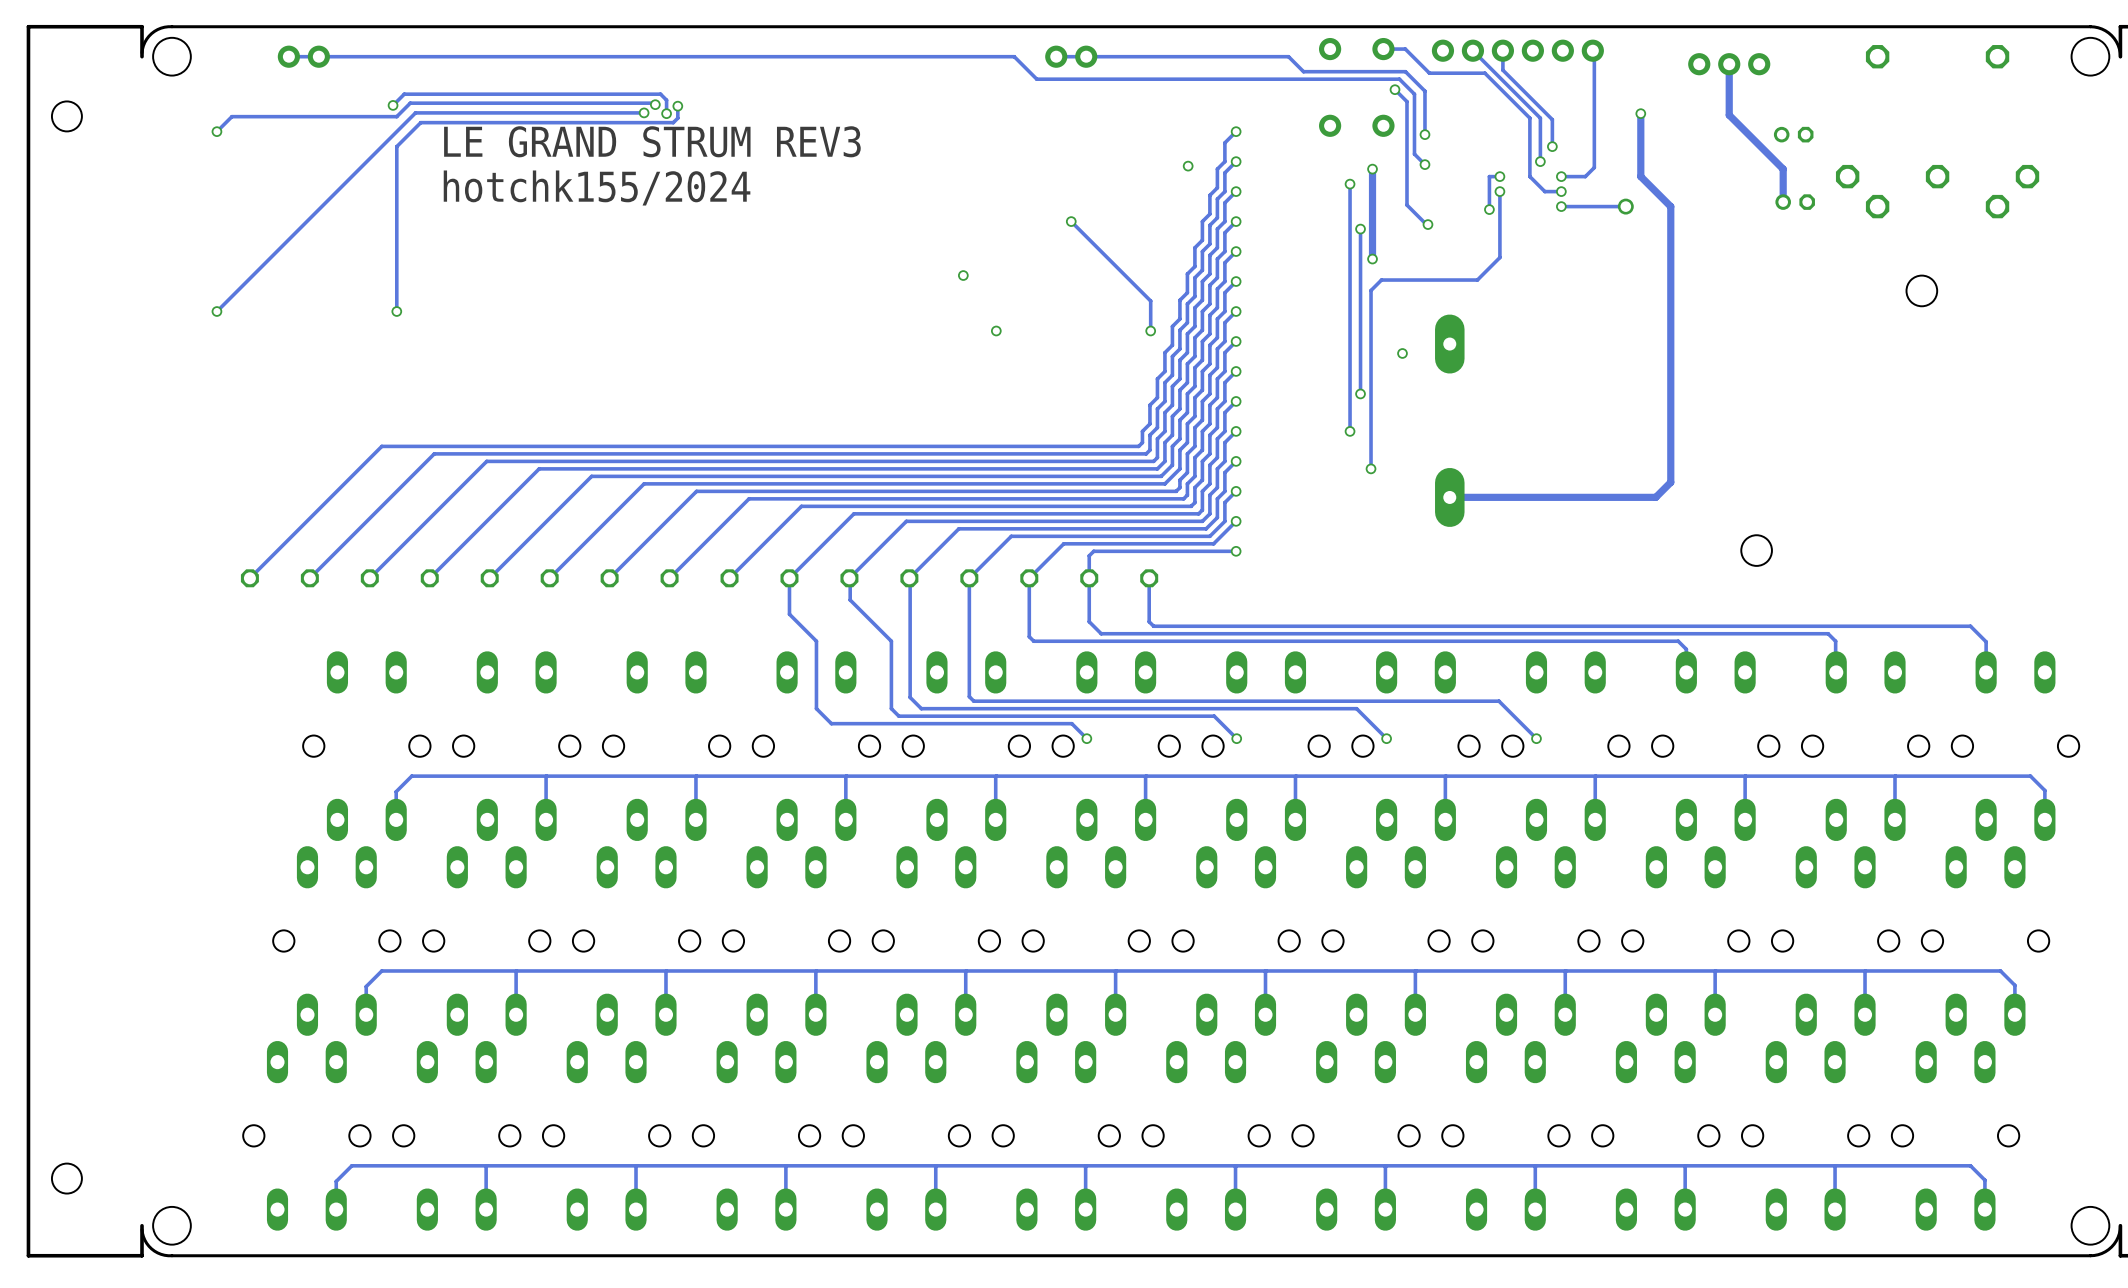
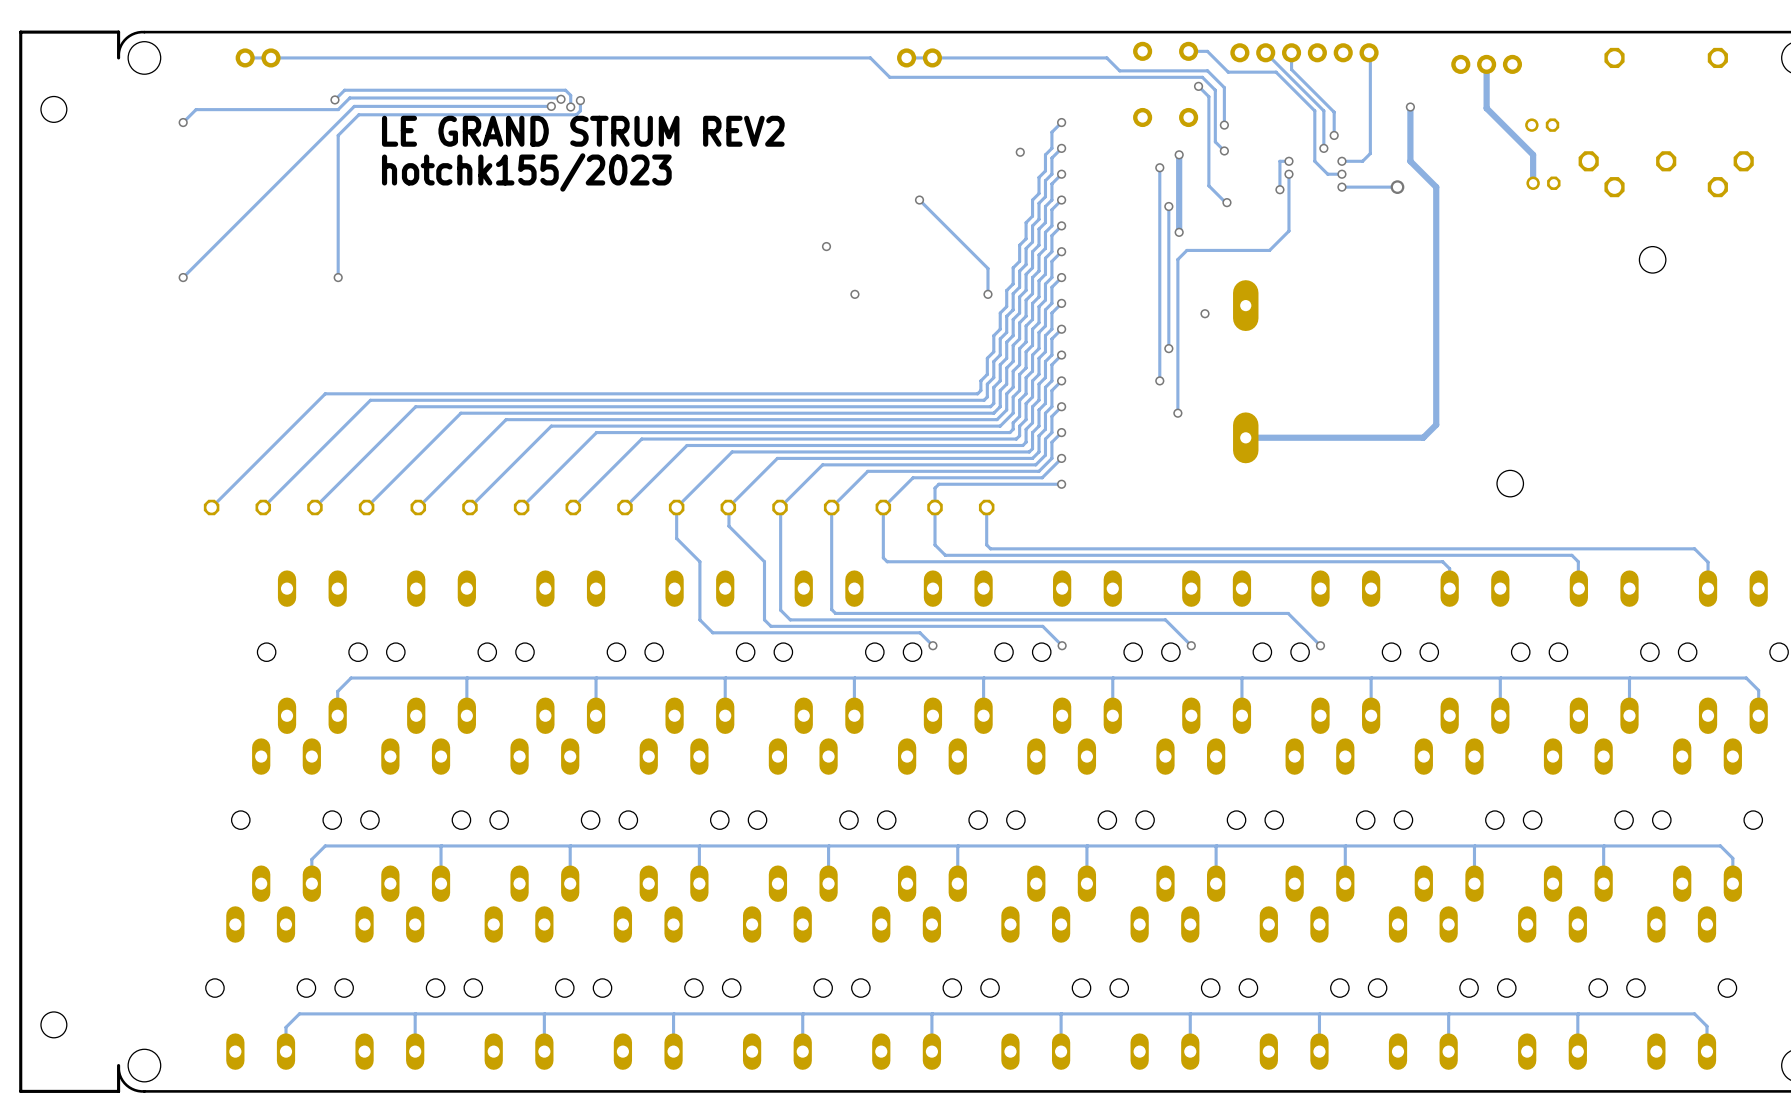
text: LE GRAND STRUM REV3 (652, 141) -> LE GRAND STRUM REV2 (583, 131)
text: hotchk155/2024 (597, 188) -> hotchk155/2023 (526, 172)

